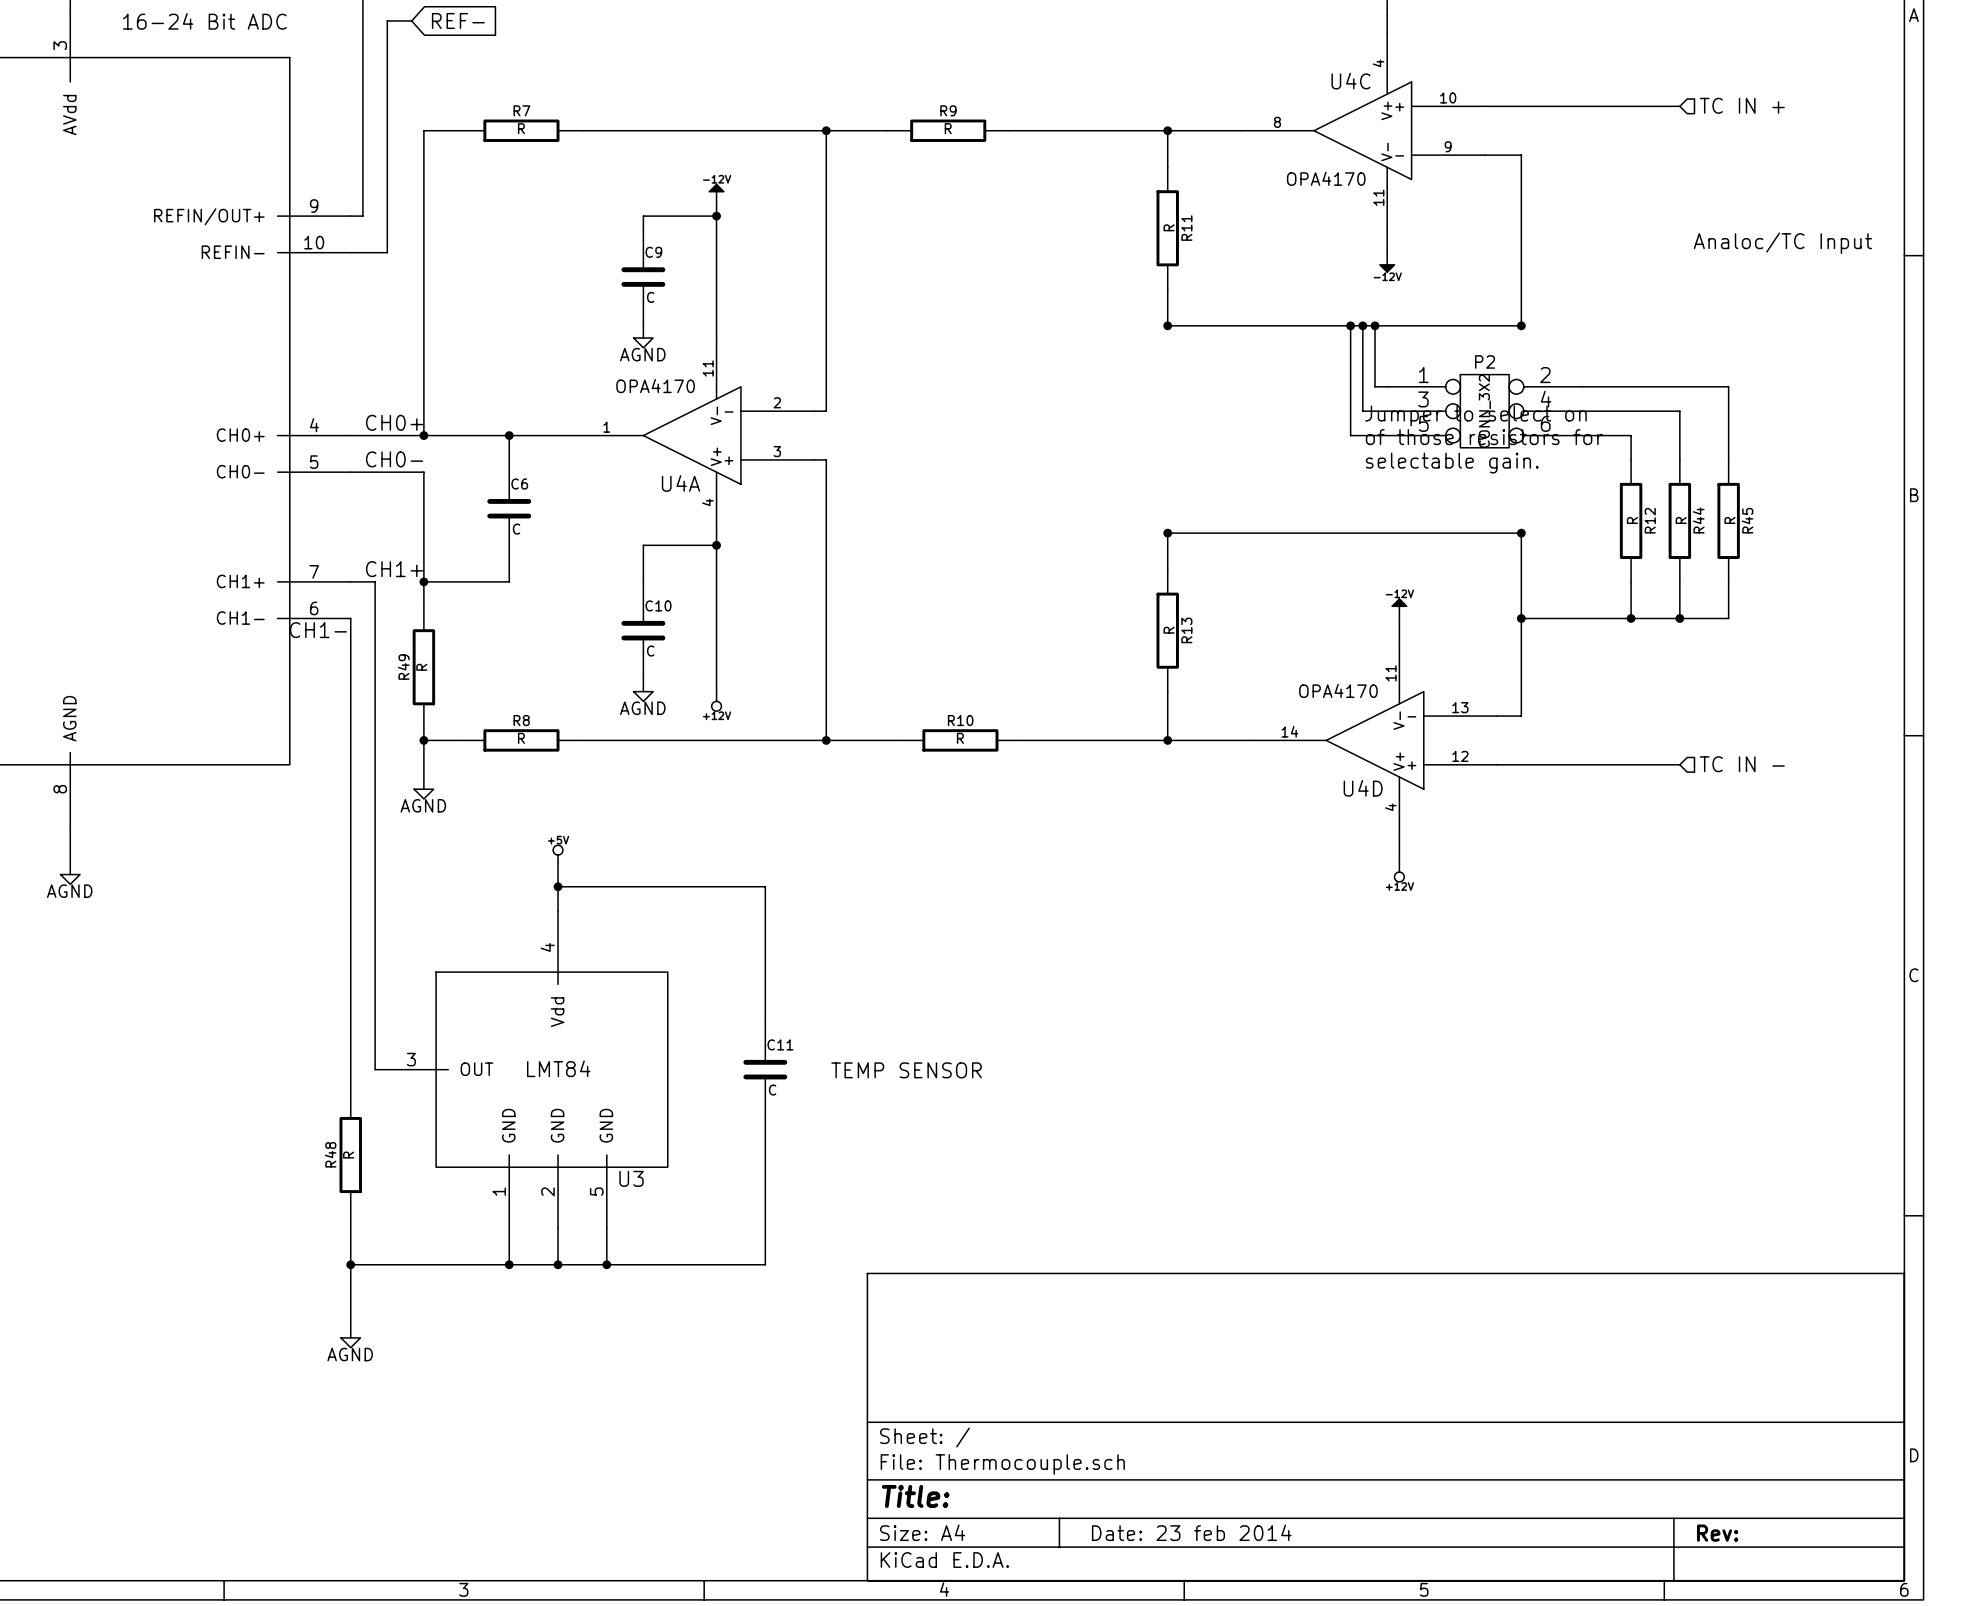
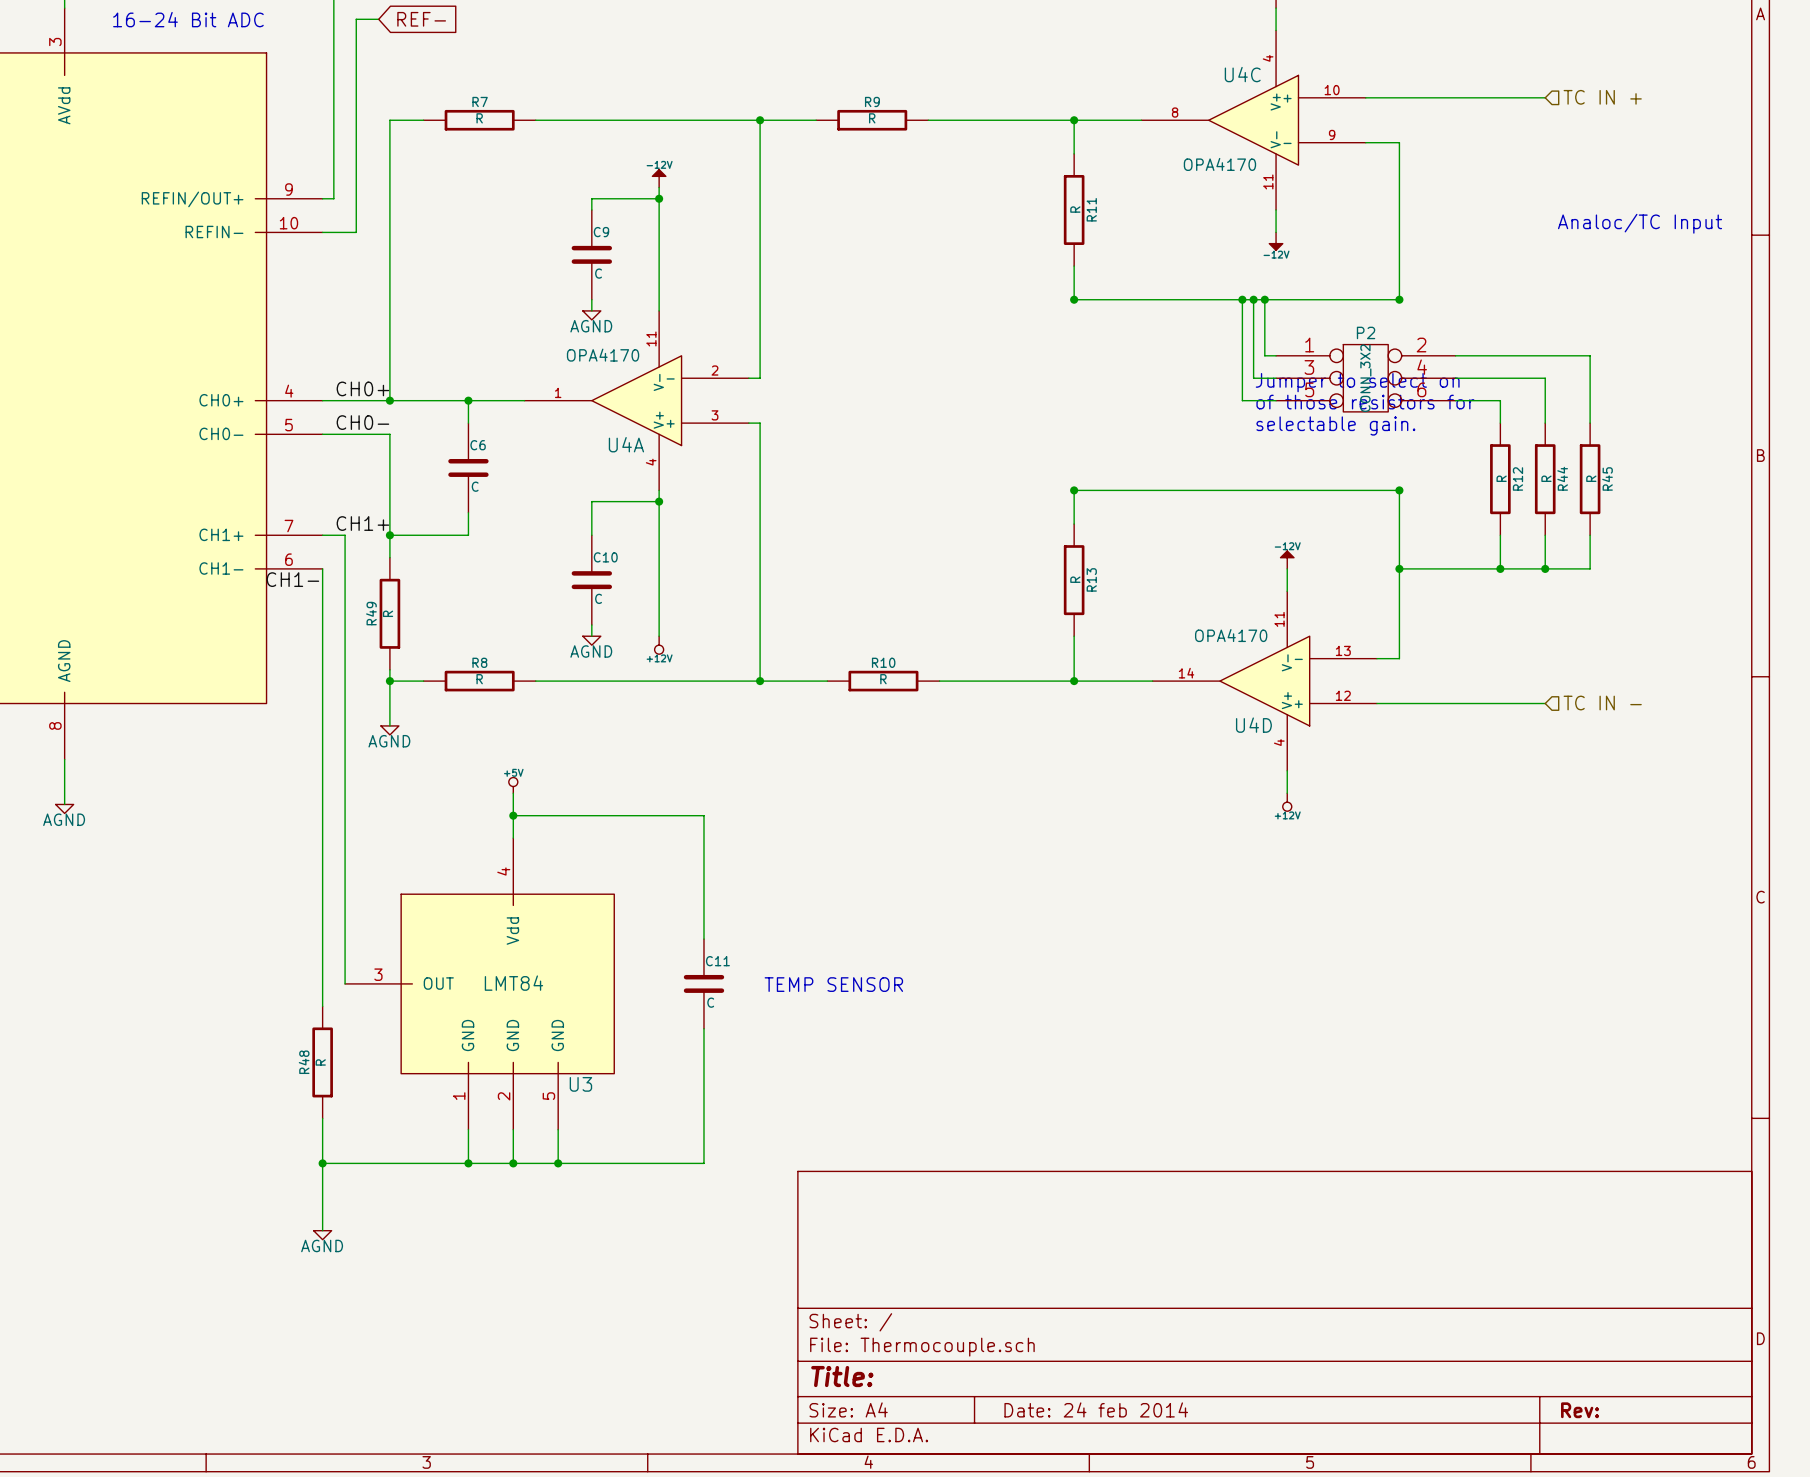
title block: Date: 23 feb 2014 (1191, 1532) -> Date: 24 feb 2014 (1096, 1409)

